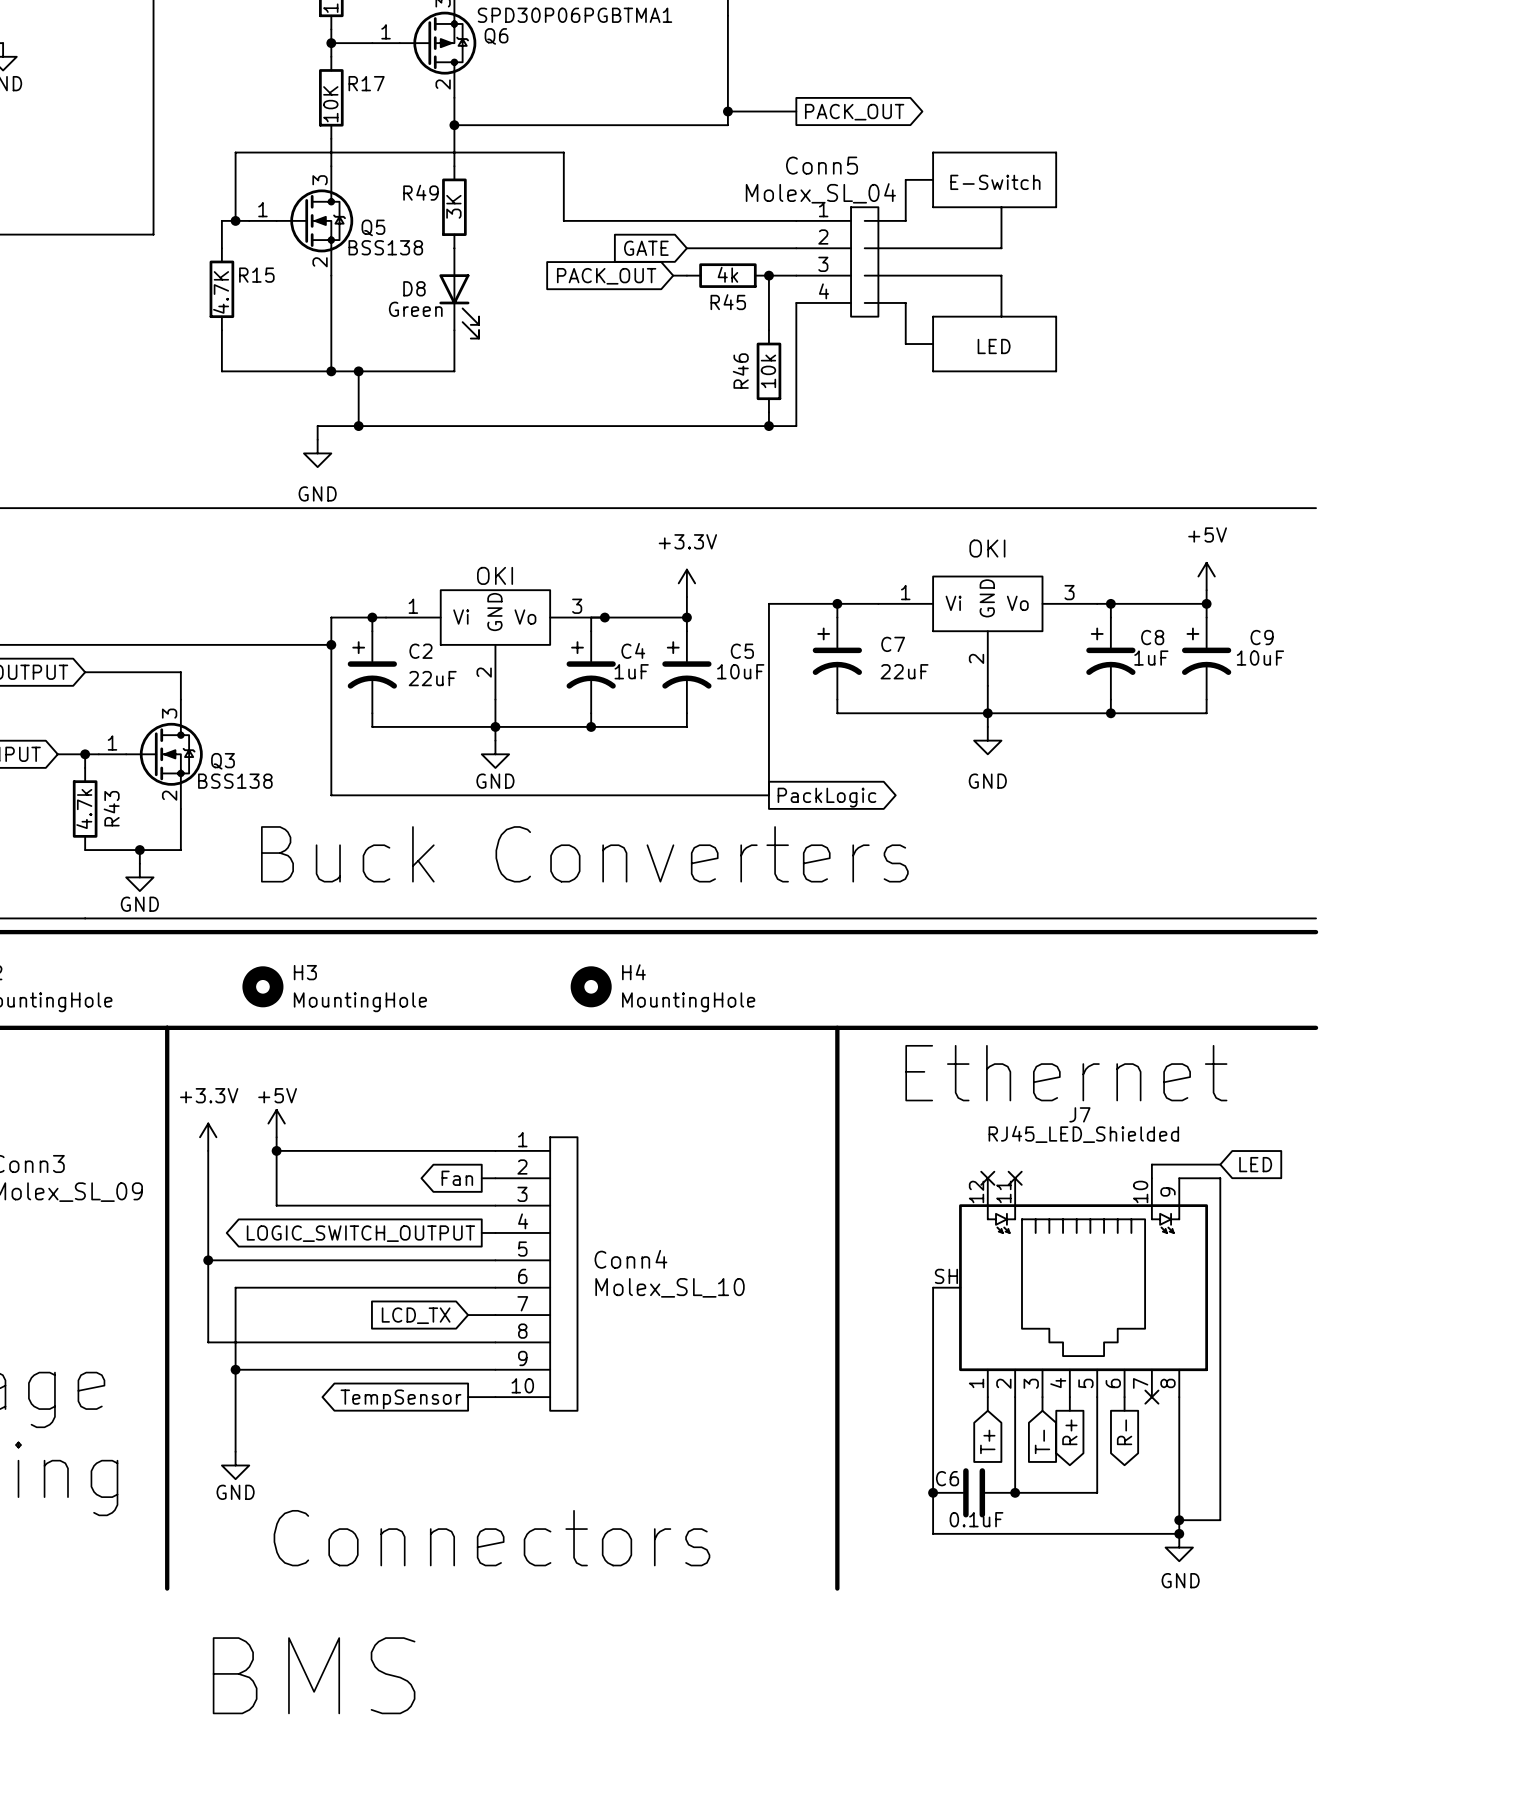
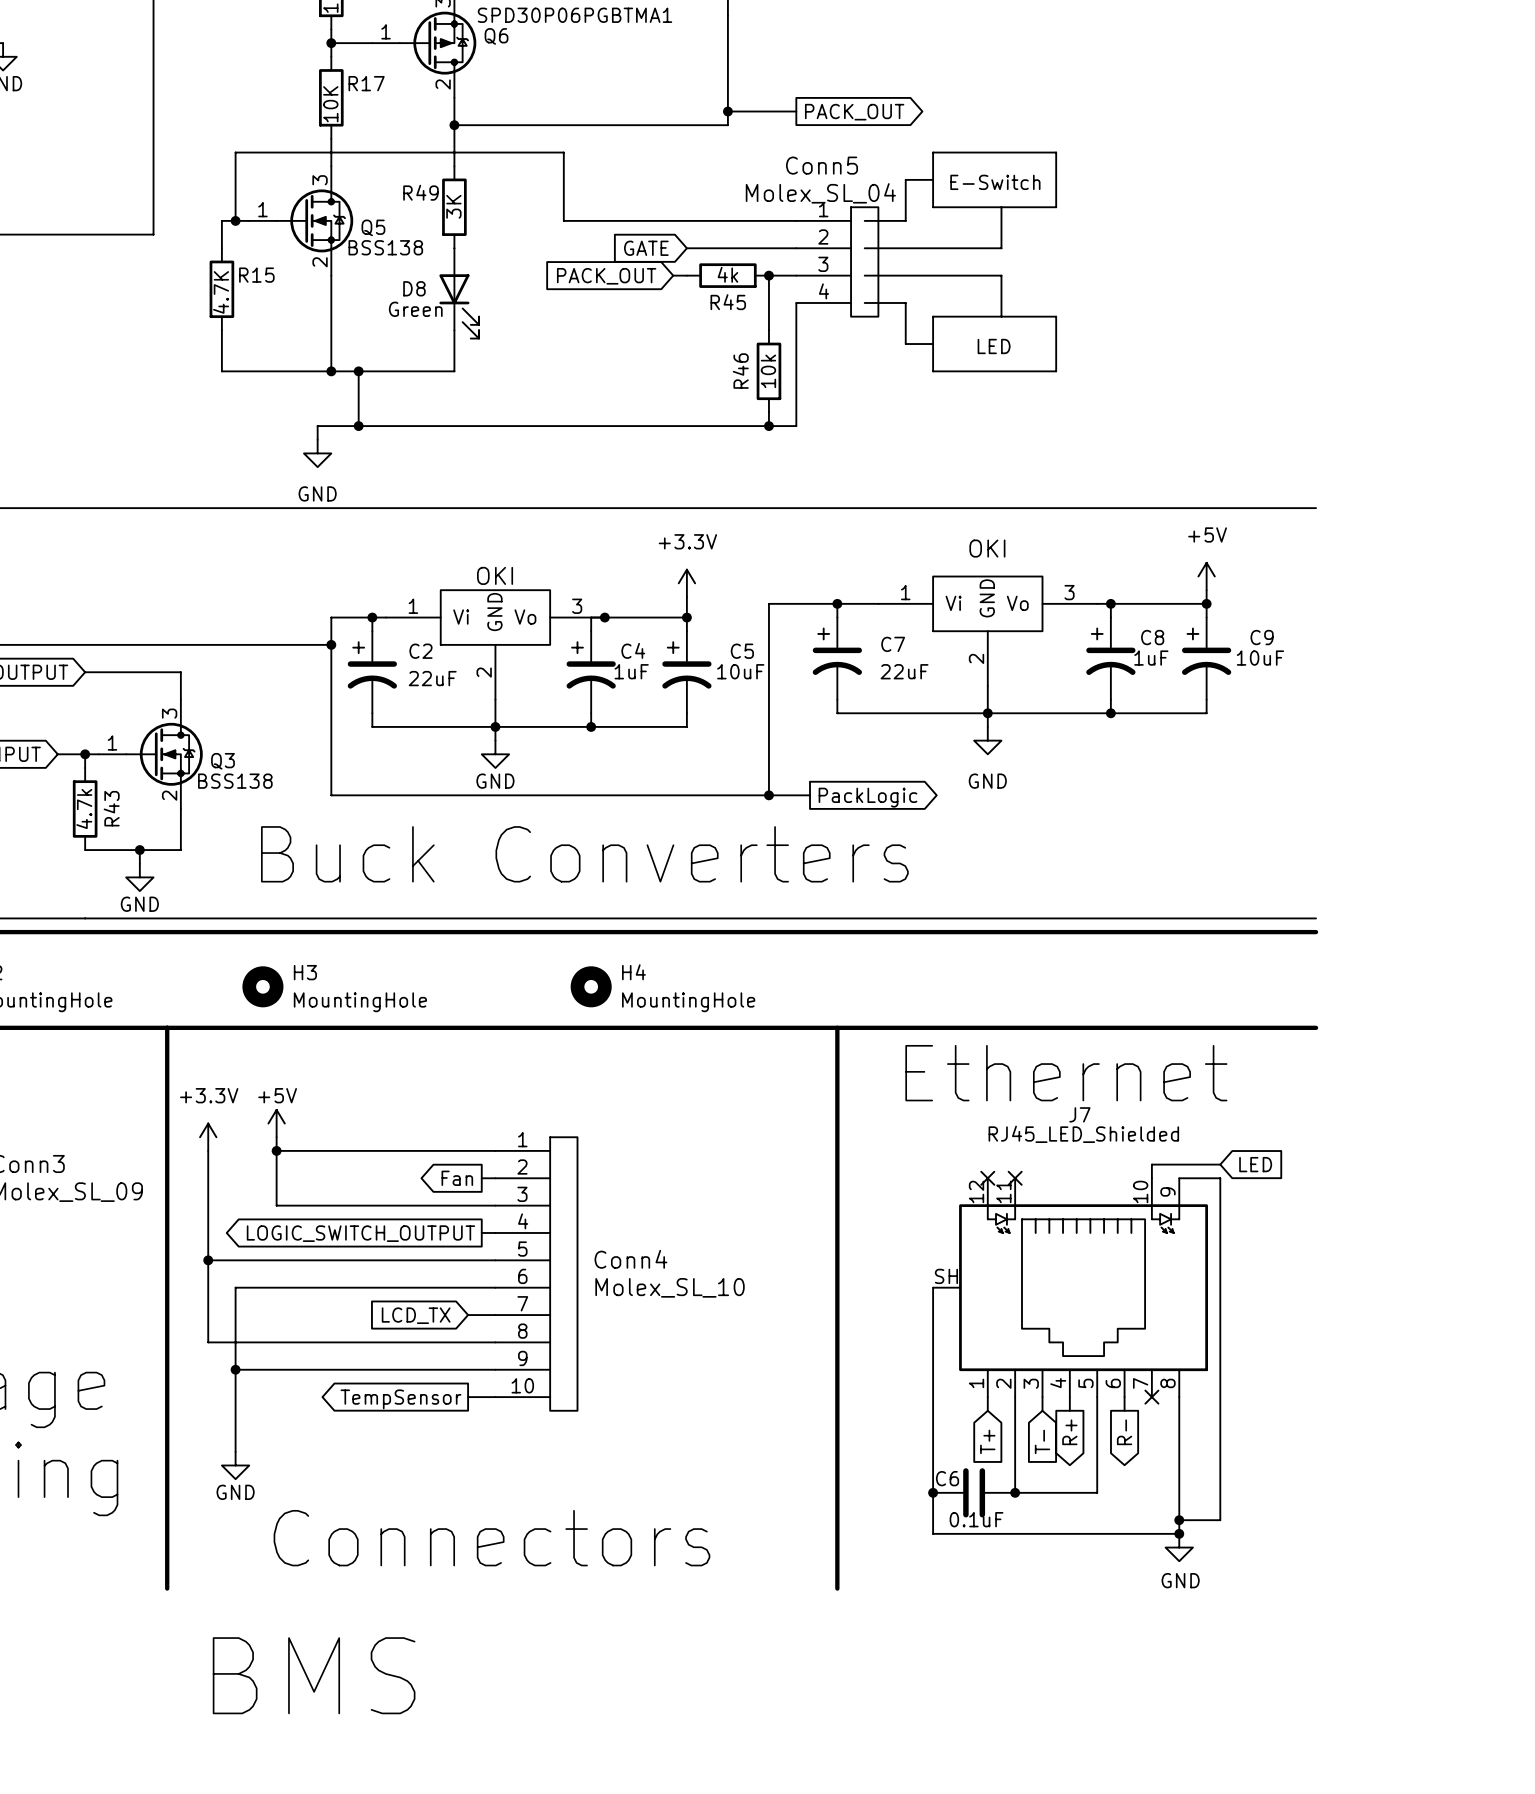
wire: none -> (768, 795) (810, 795)
junction: none -> (768, 795)
global label position: PackLogic (826, 797) -> PackLogic (867, 797)

